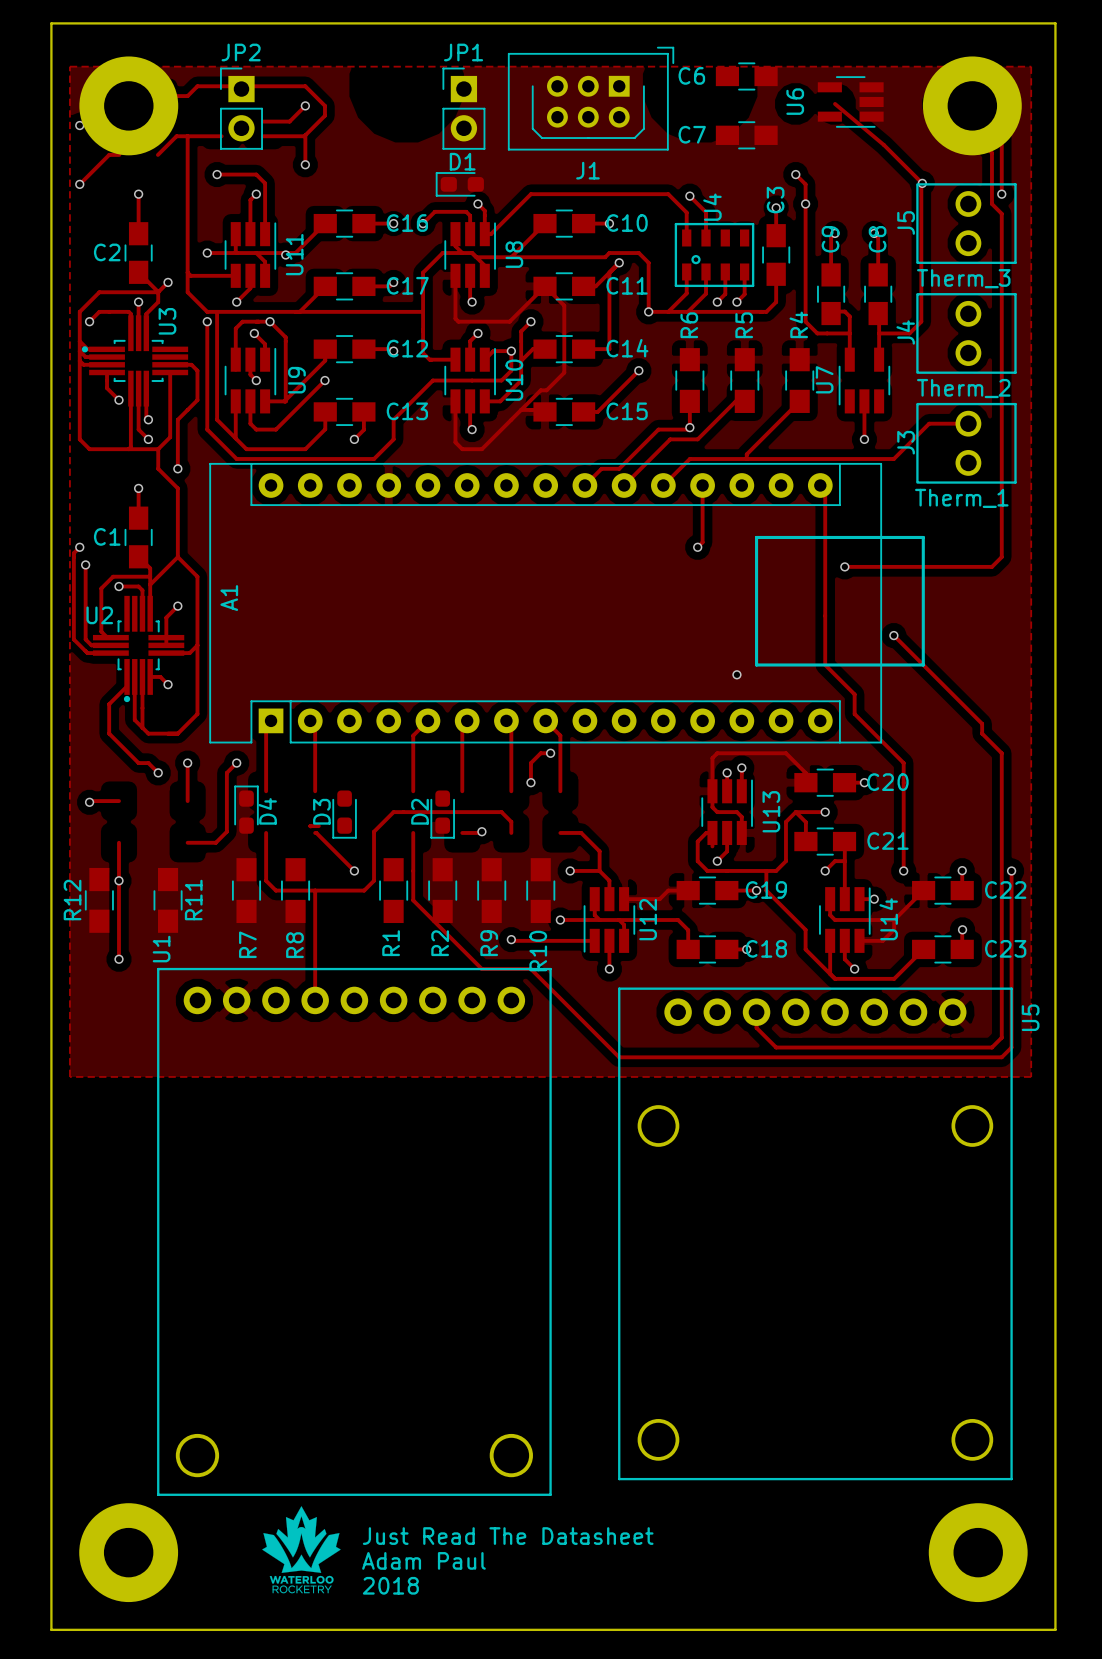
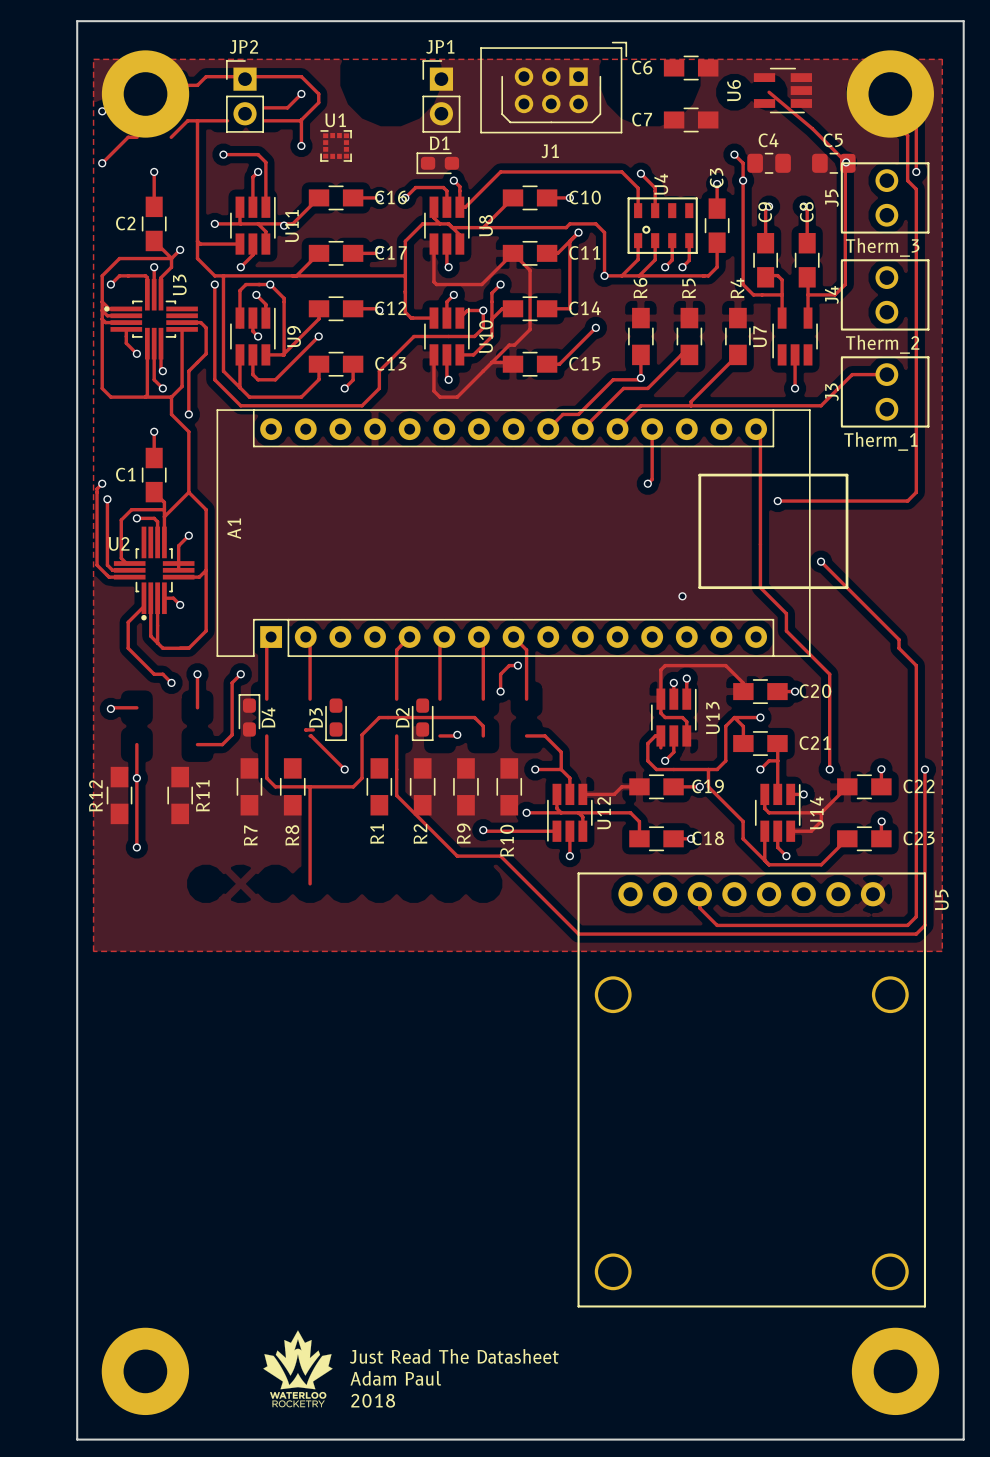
C4: none -> (769, 163)
C5: none -> (833, 163)
U1 name position: U1 (161, 949) -> U1 (335, 120)
U1 footprint: [157, 967, 552, 1496] -> [320, 130, 352, 162]

